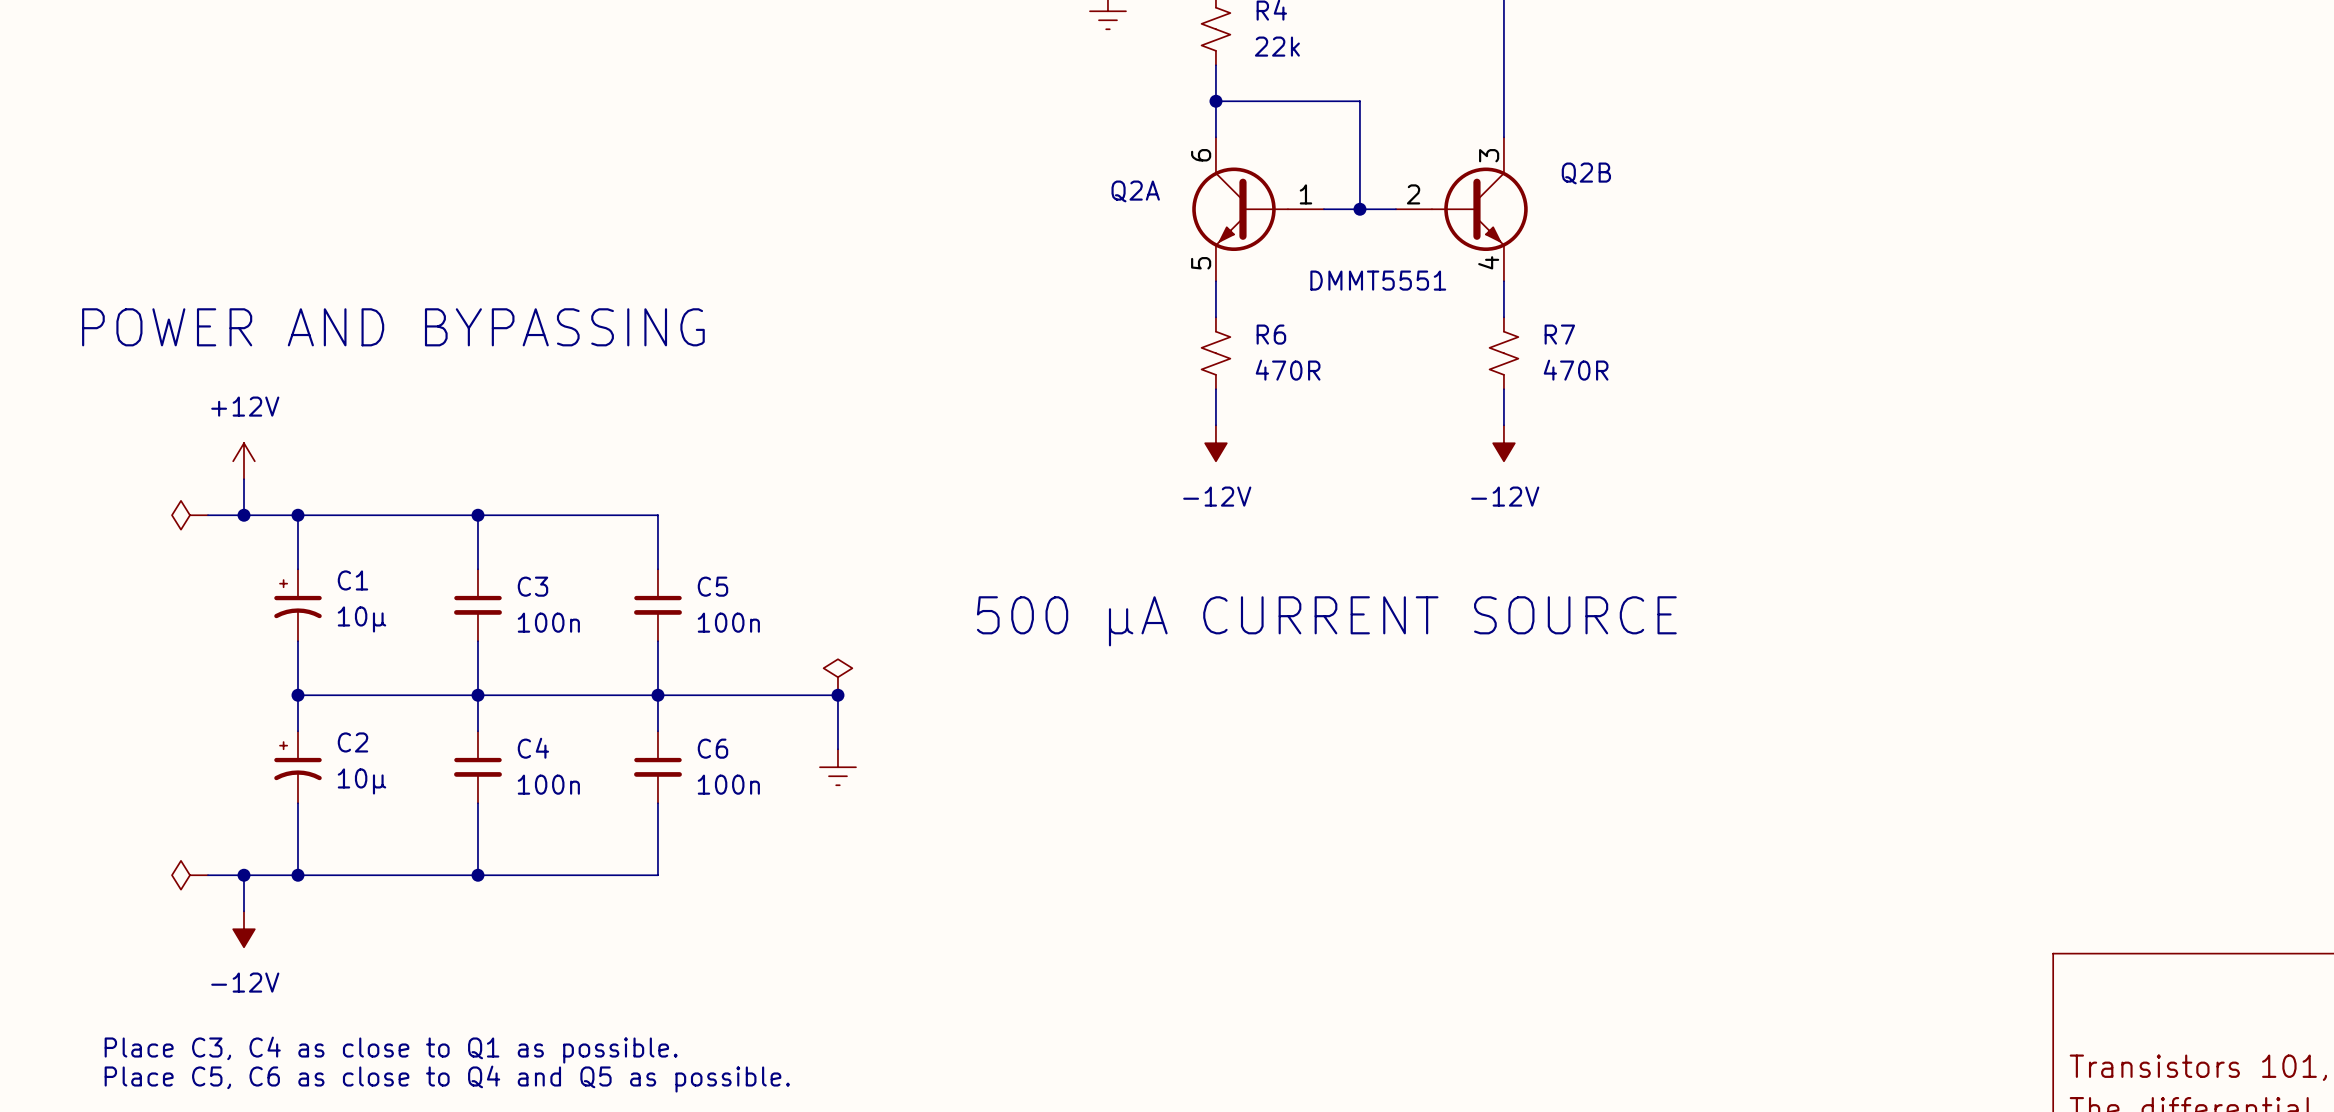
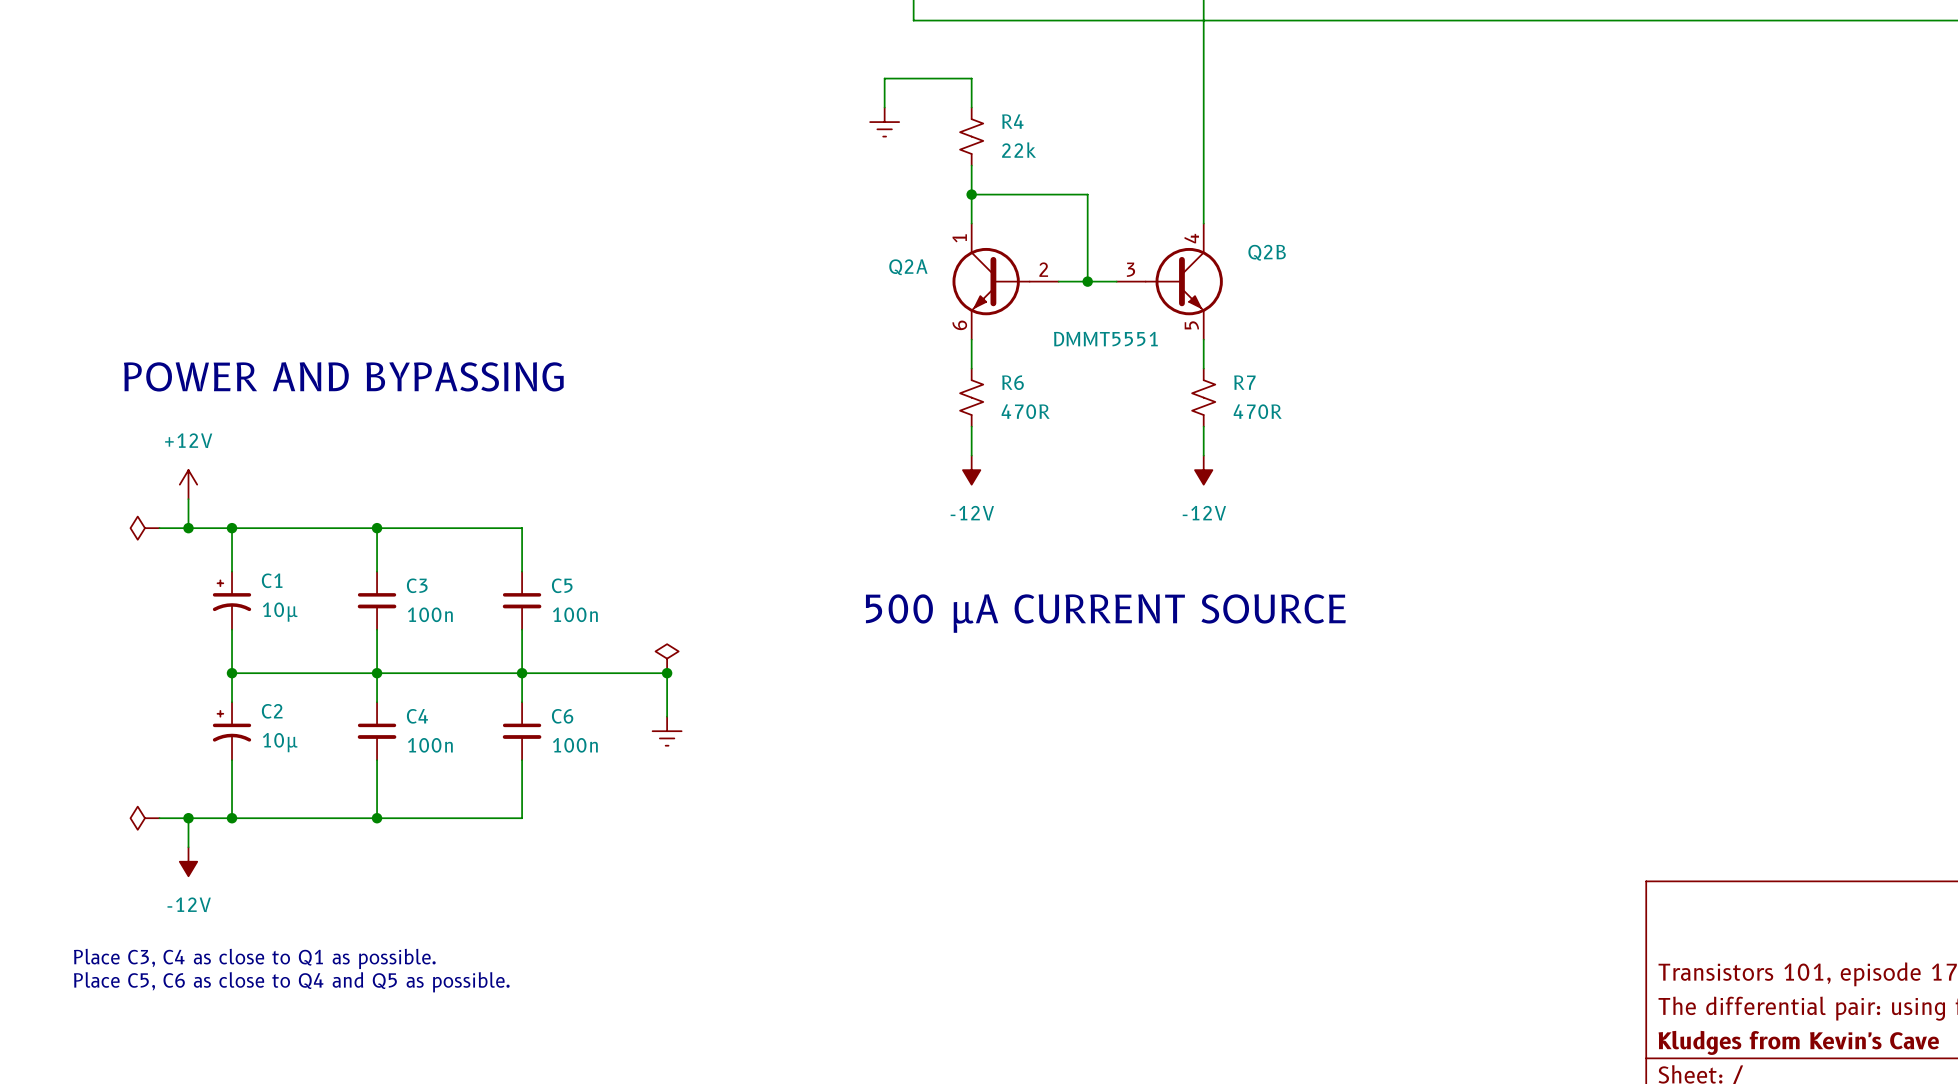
Q2A pin number: 6 (1201, 155) -> 1 (959, 238)
Q2B pin number: 3 (1489, 155) -> 4 (1191, 238)
Q2A pin number: 1 (1305, 194) -> 2 (1043, 269)
Q2B pin number: 2 (1413, 194) -> 3 (1130, 269)
Q2B pin number: 4 (1488, 262) -> 5 (1191, 325)
Q2A pin number: 5 (1201, 263) -> 6 (959, 325)

